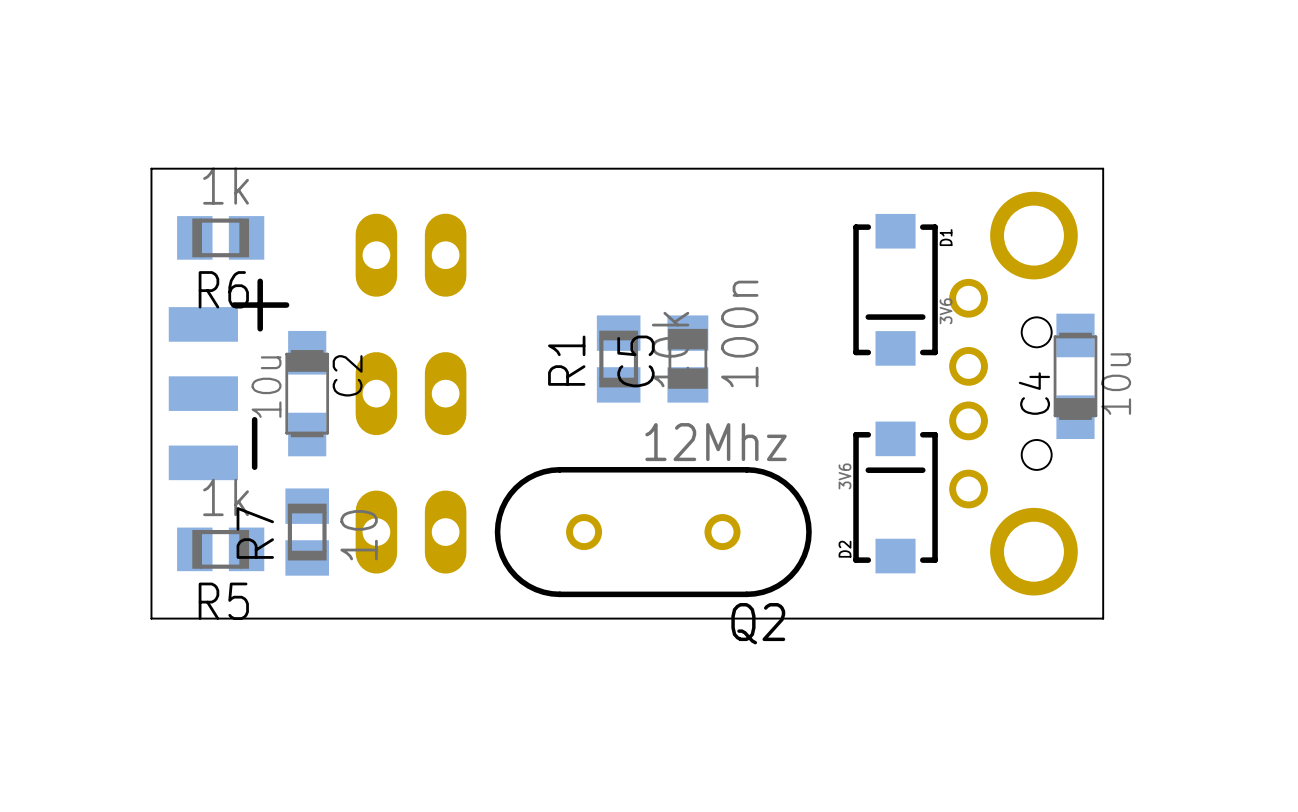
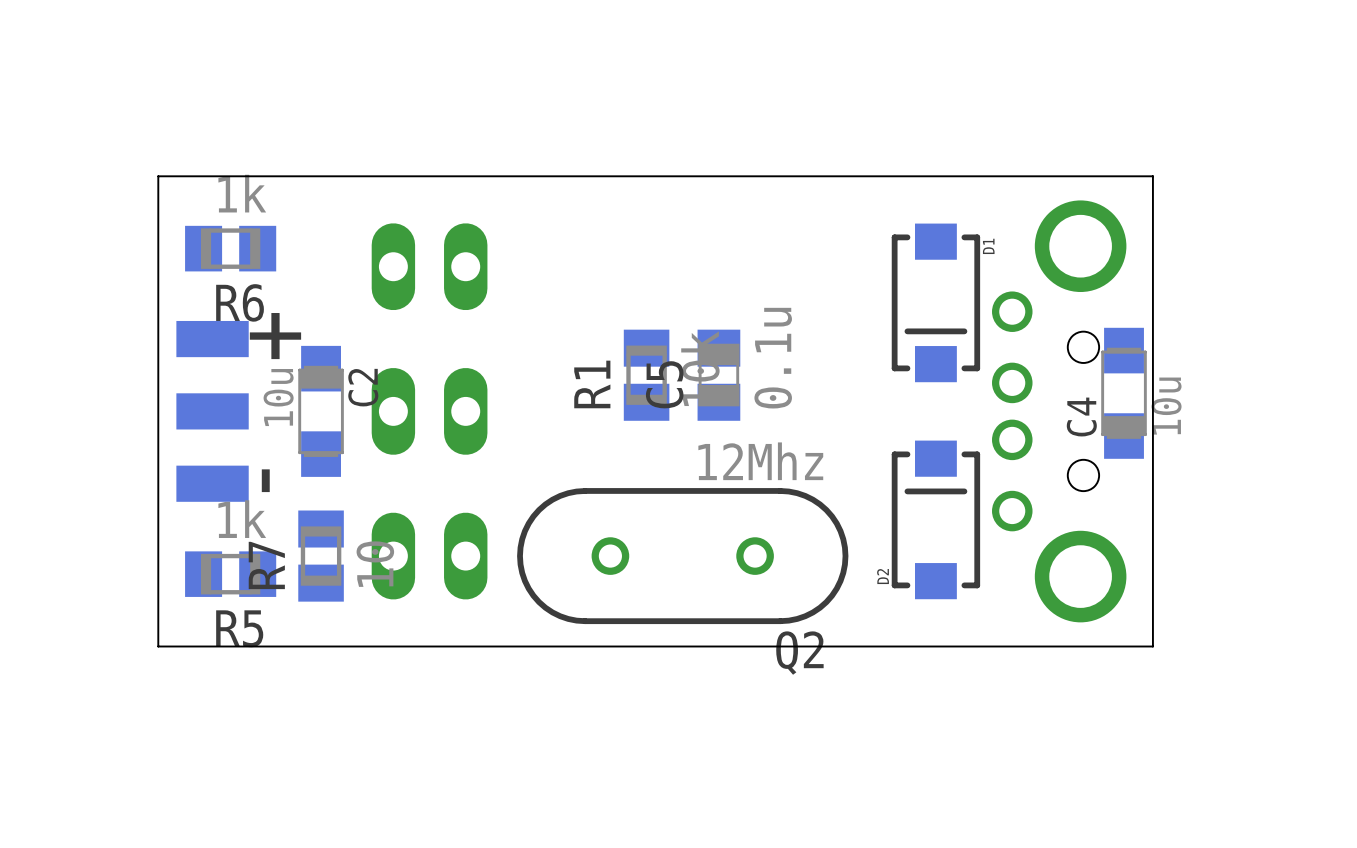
D1 value: 3V6 (946, 311) -> none
C5 value: 100n (739, 333) -> 0.1u (773, 358)
D2 value: 3V6 (845, 476) -> none

